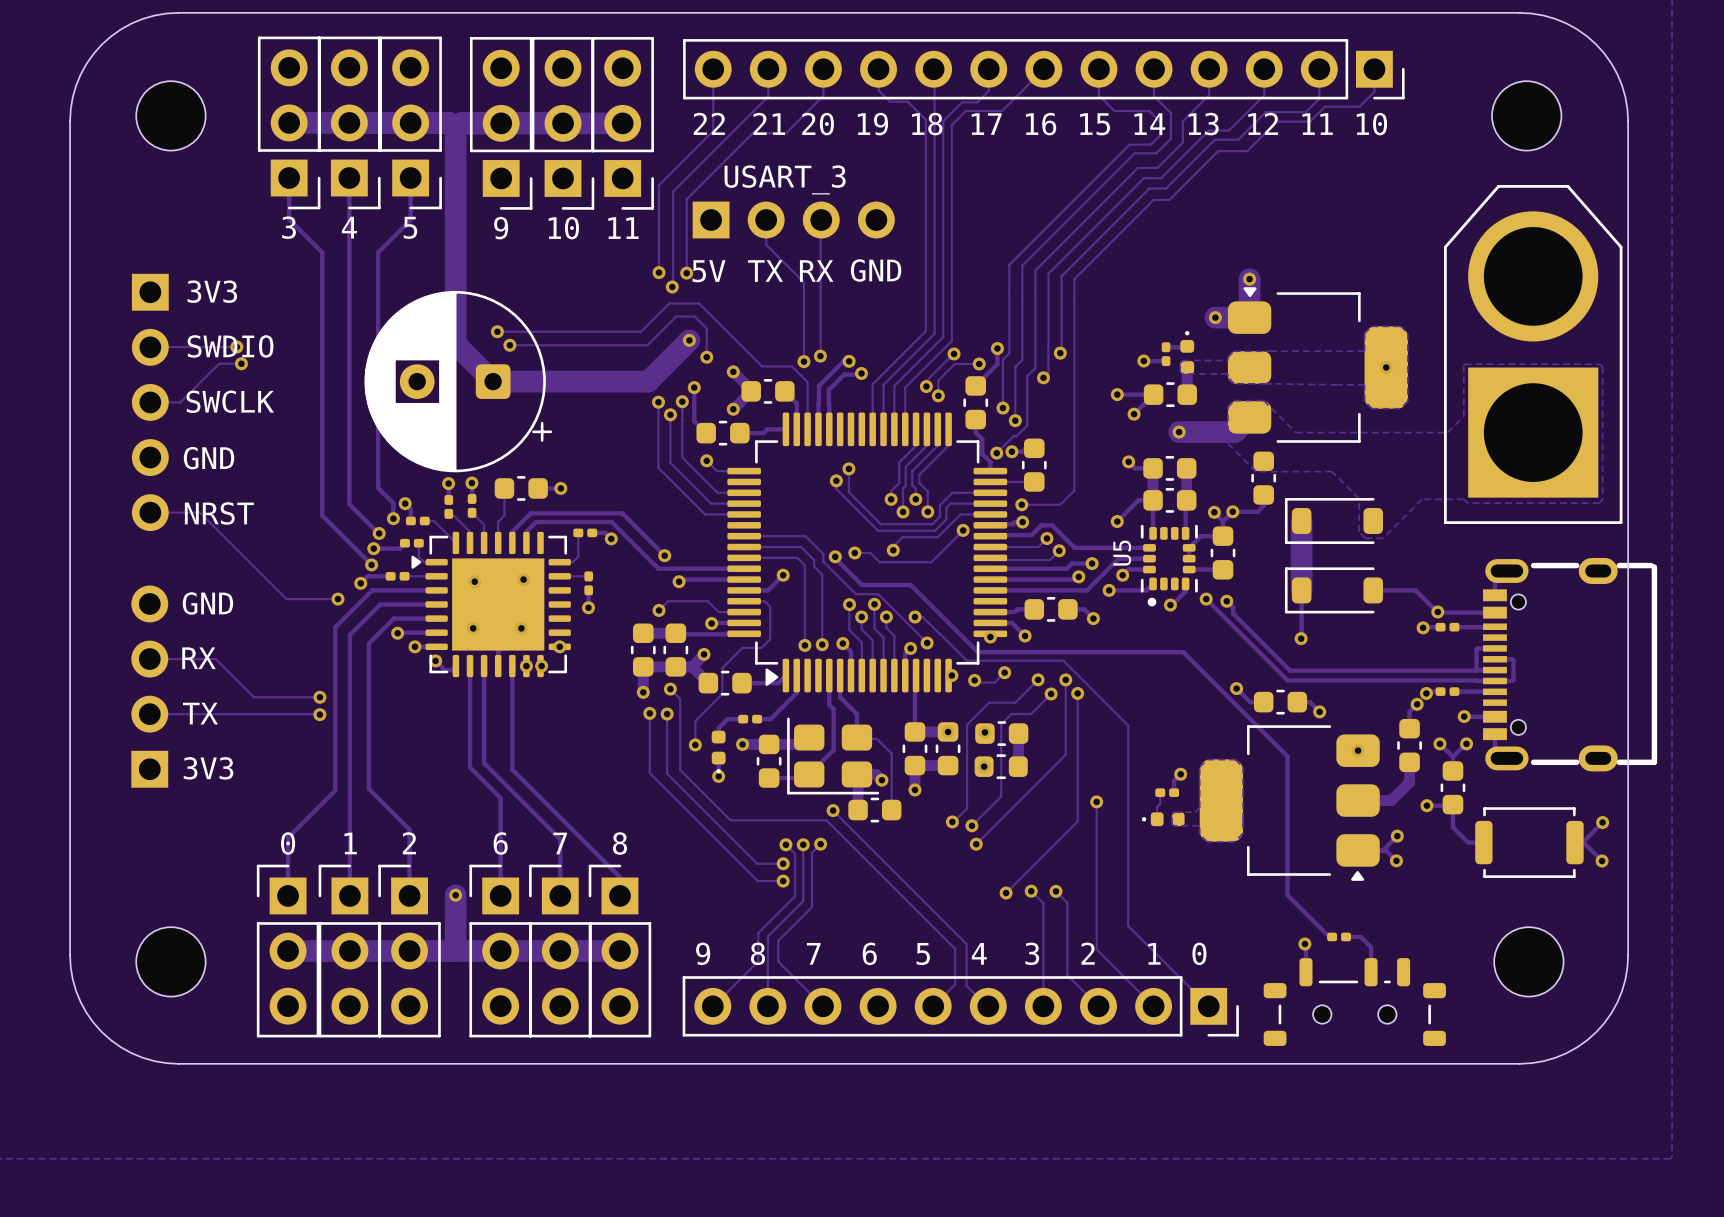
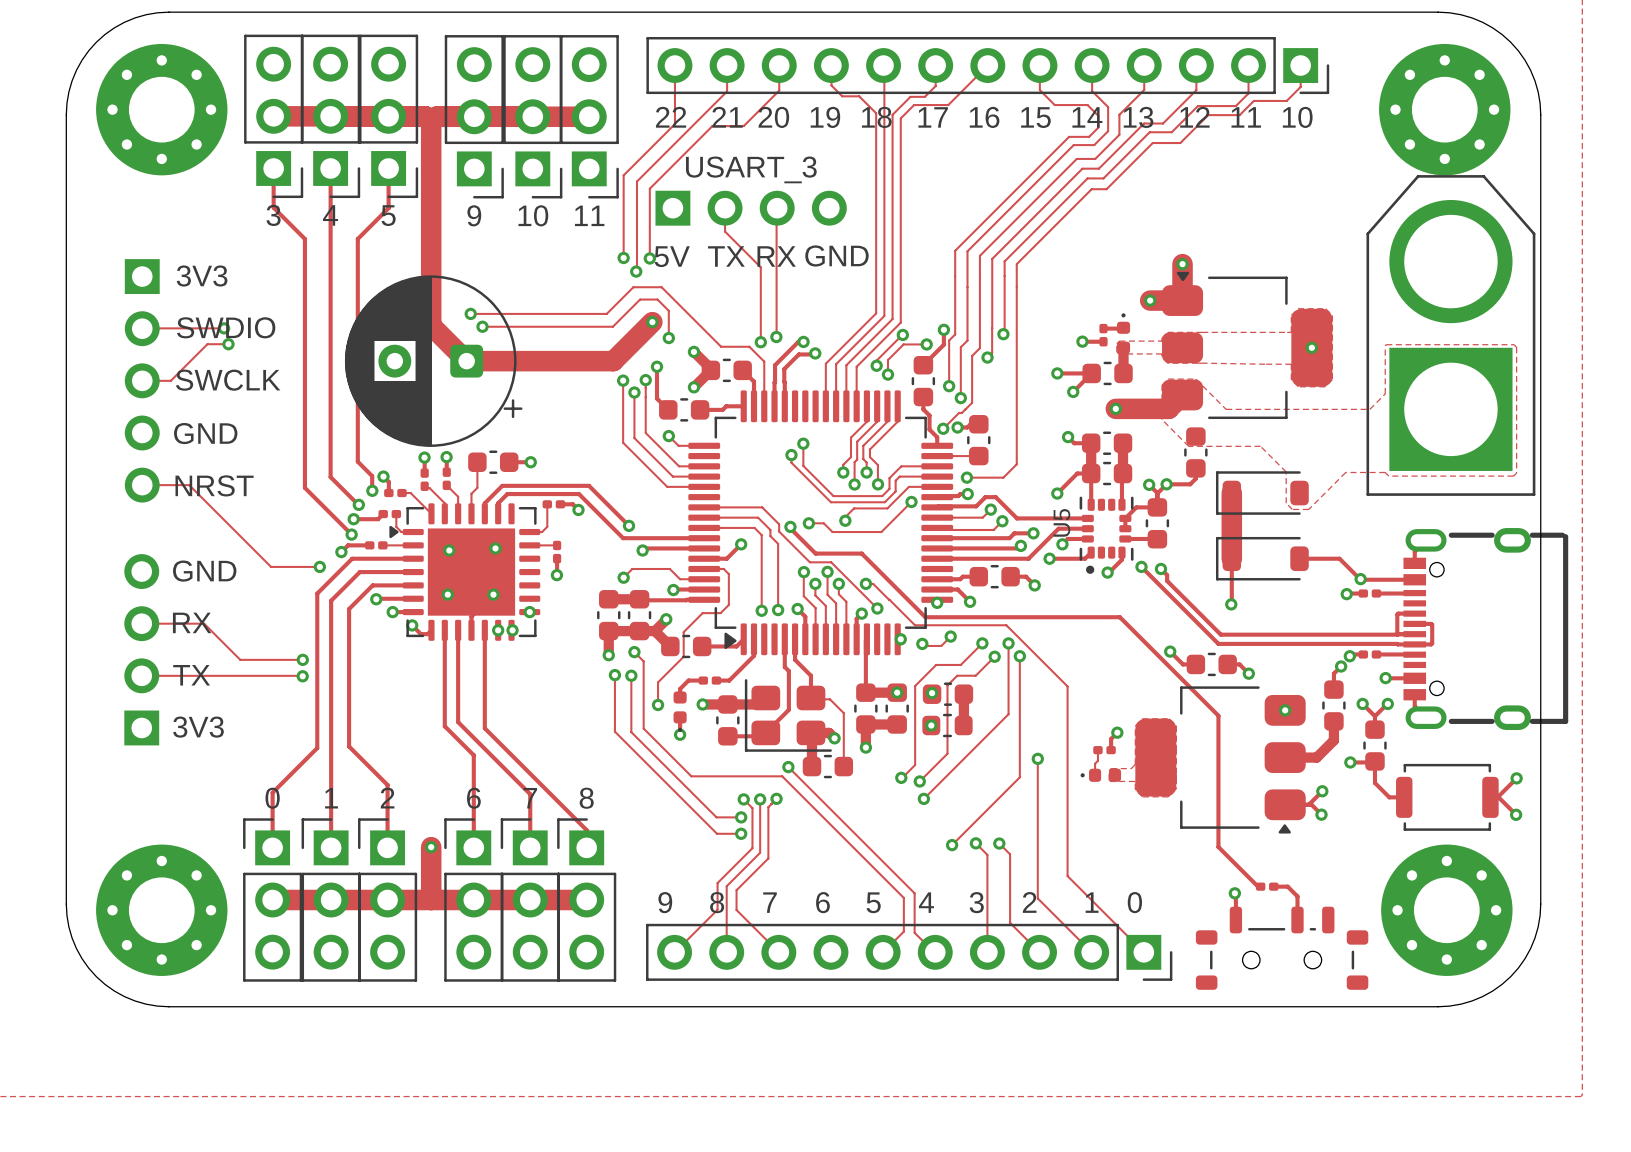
part footprint: [136, 81, 206, 151] -> [96, 43, 228, 176]
part footprint: [1492, 81, 1562, 151] -> [1379, 43, 1511, 176]
part footprint: [136, 927, 206, 997] -> [96, 844, 228, 976]
part footprint: [1494, 927, 1564, 997] -> [1381, 844, 1513, 976]

